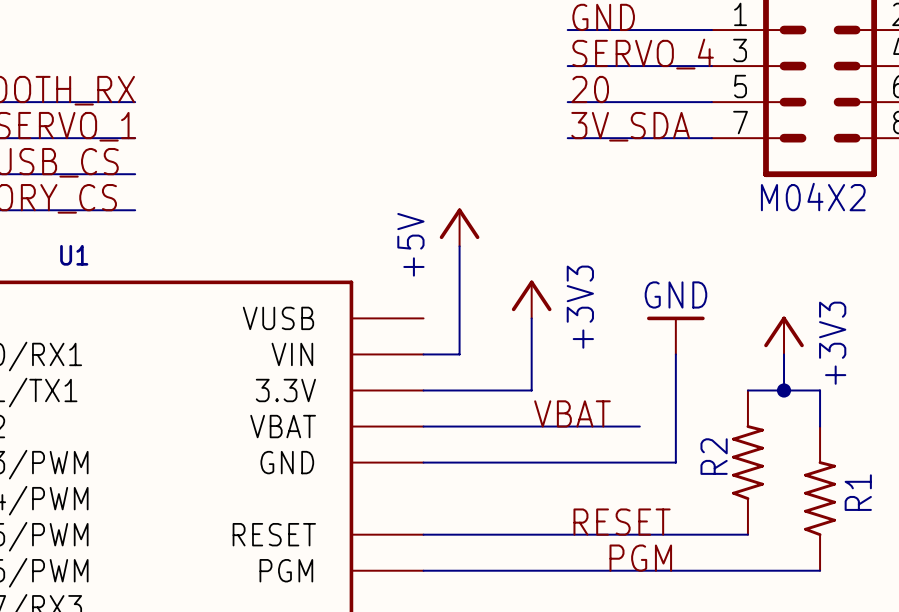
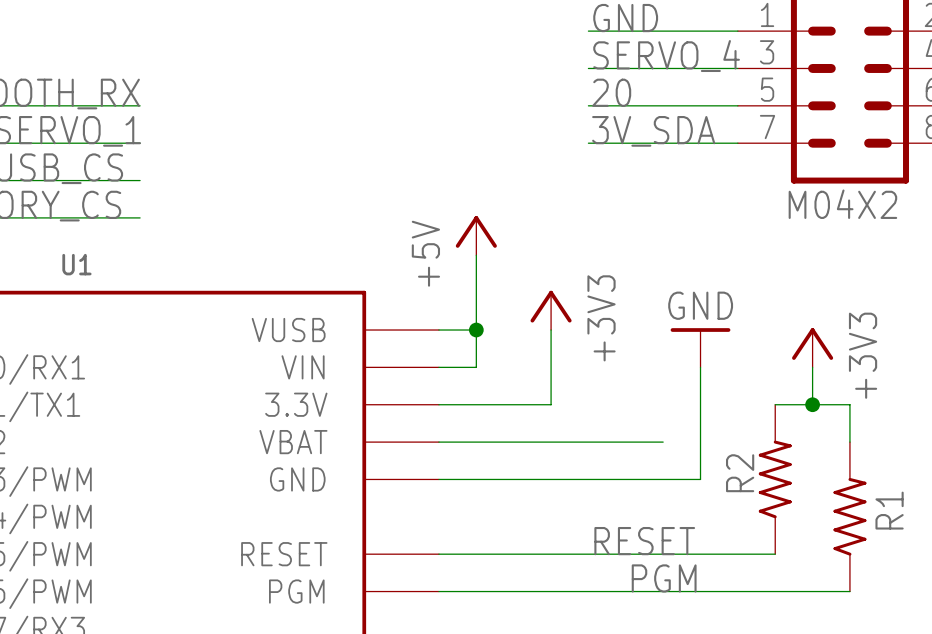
wire: none -> (438, 330) (476, 330)
junction: none -> (476, 330)
label: VBAT (572, 413) -> none

